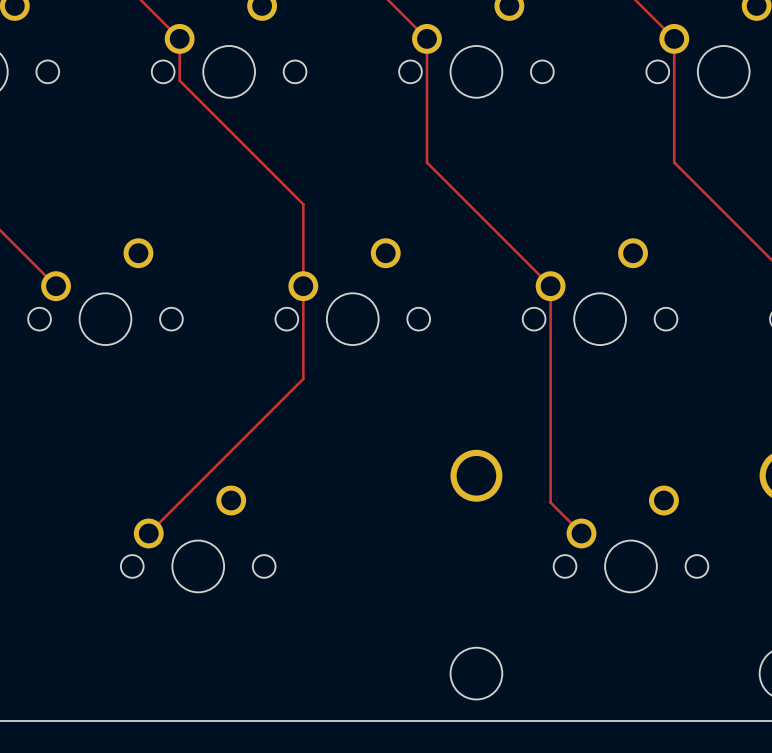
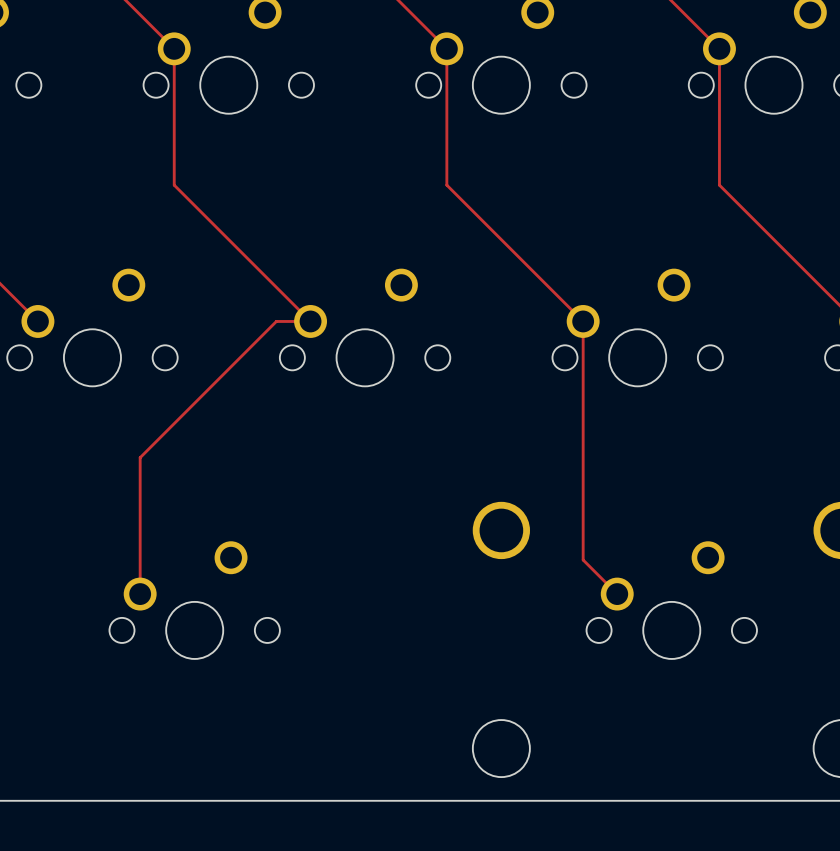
track: (179, 80) (303, 204) (303, 378) (148, 533) -> (174, 94) (174, 185) (310, 321) (276, 321) (140, 457) (140, 594)

